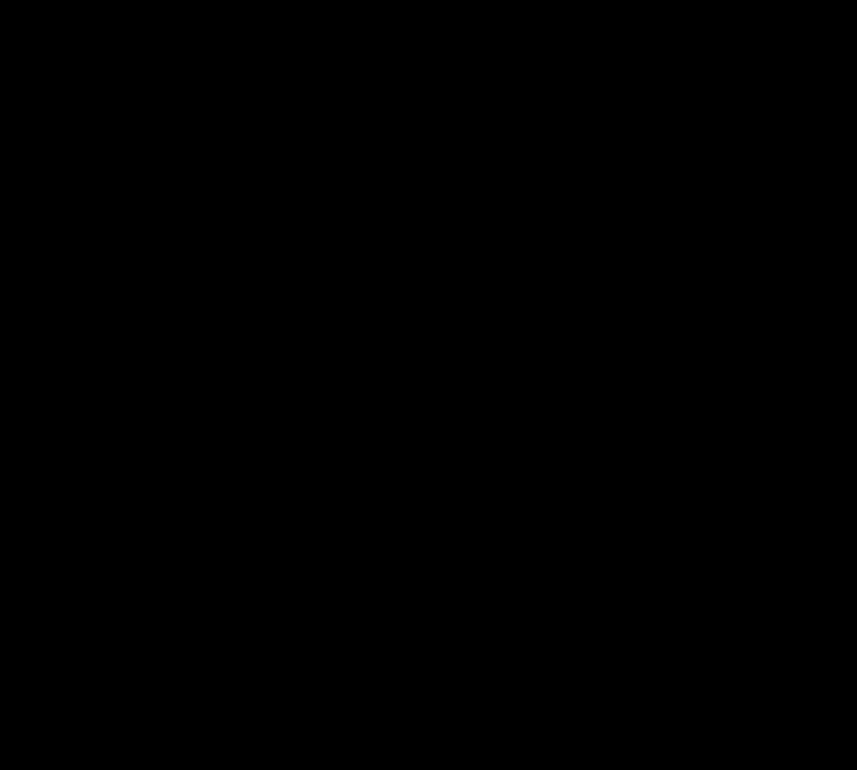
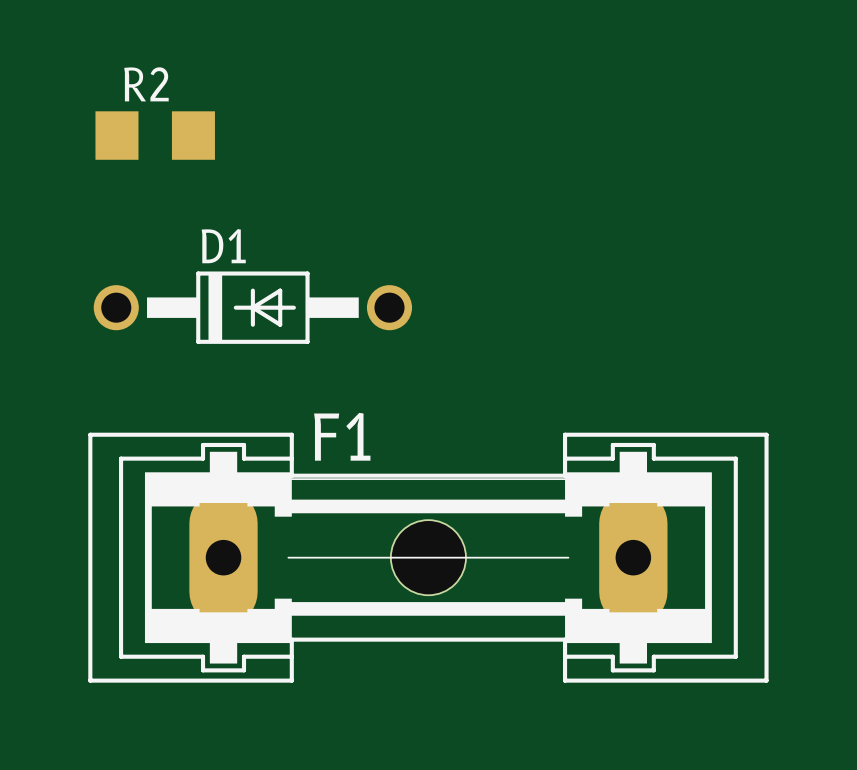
R2: none -> (155, 135)
D1: none -> (252, 307)
F1: none -> (428, 557)

